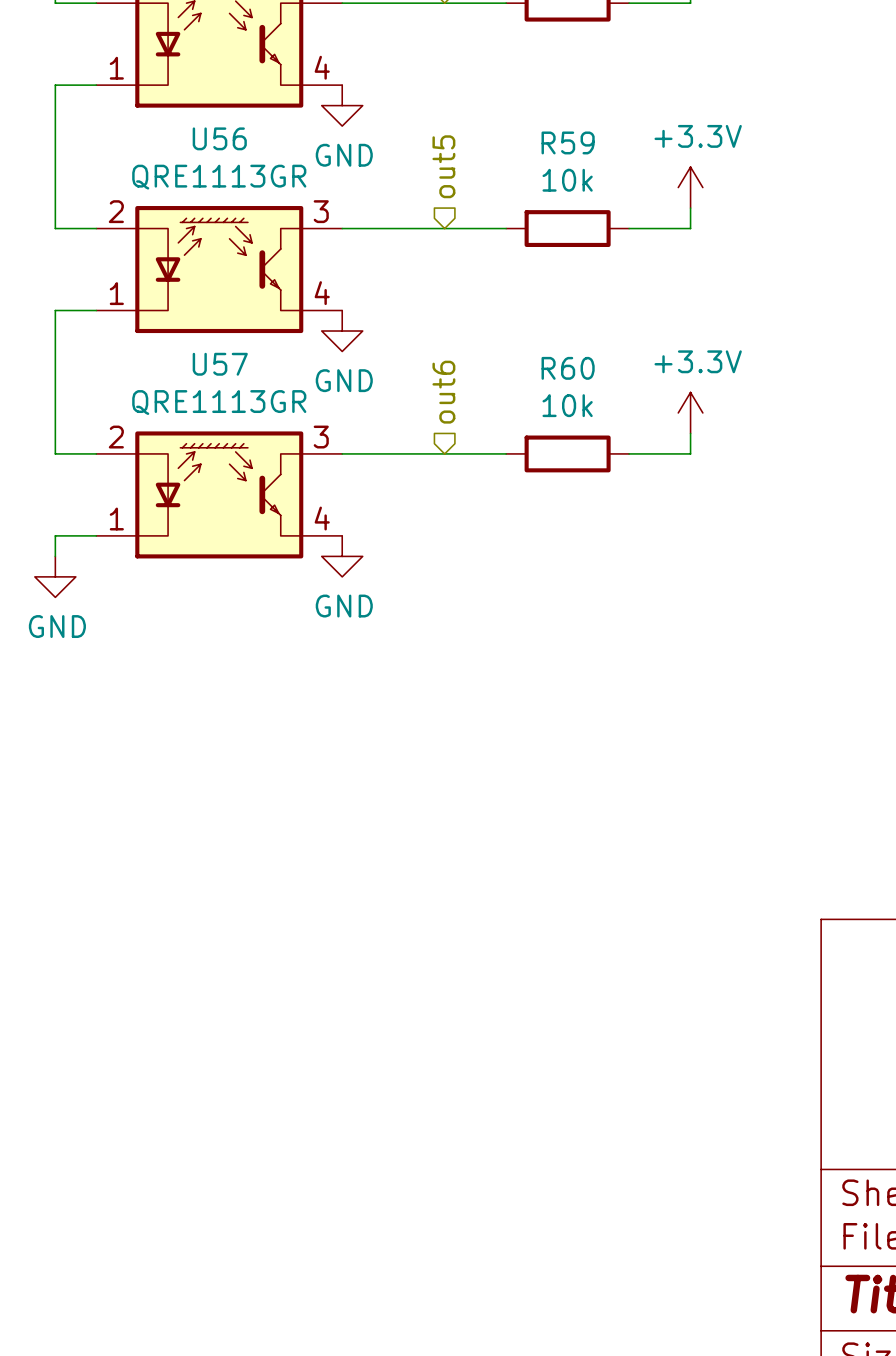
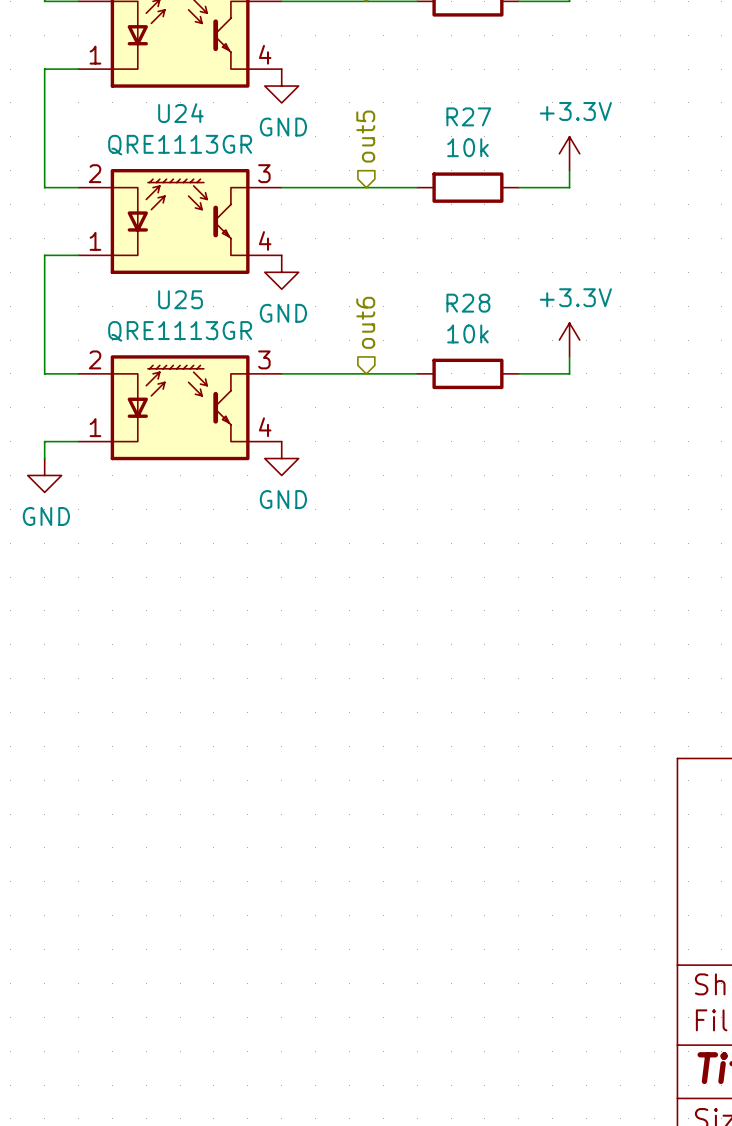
U56 name: U56 (219, 138) -> U24 (180, 113)
R59 name: R59 (568, 142) -> R27 (468, 116)
U57 name: U57 (220, 364) -> U25 (180, 299)
R60 name: R60 (568, 368) -> R28 (468, 303)

